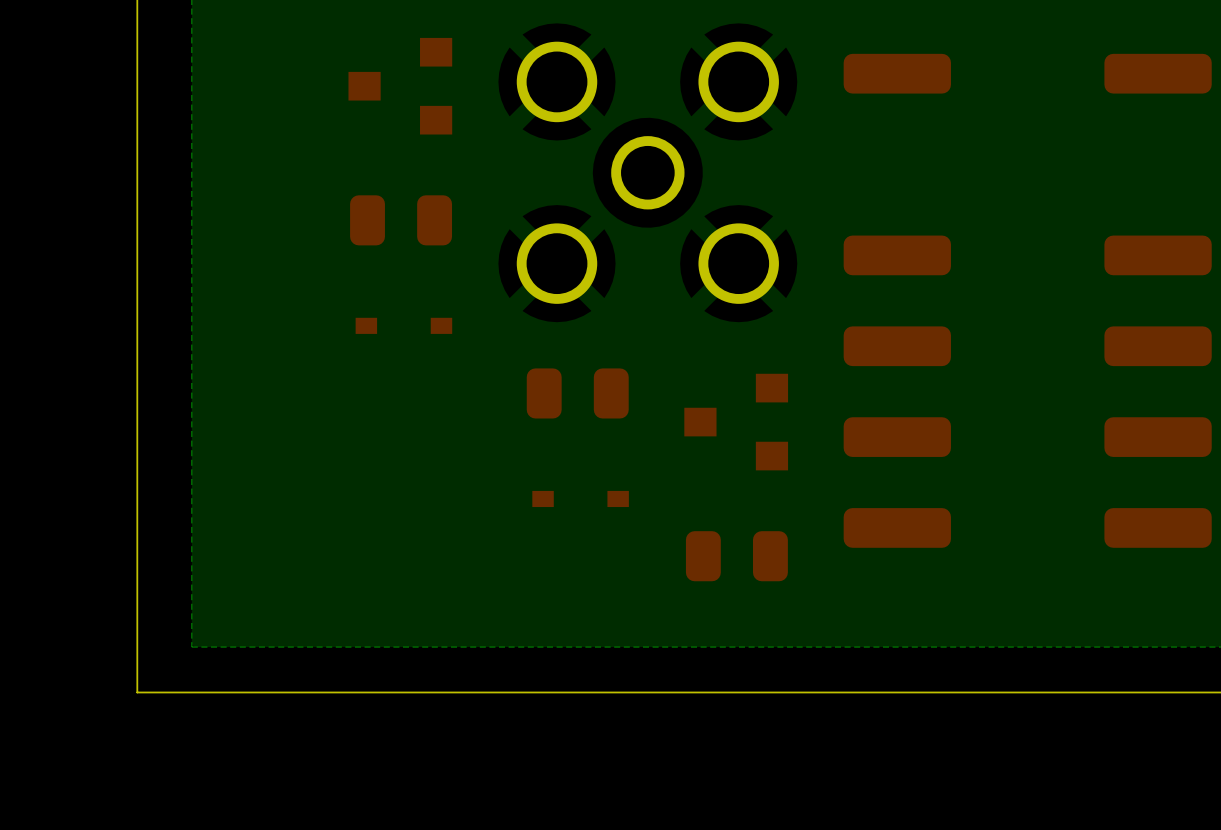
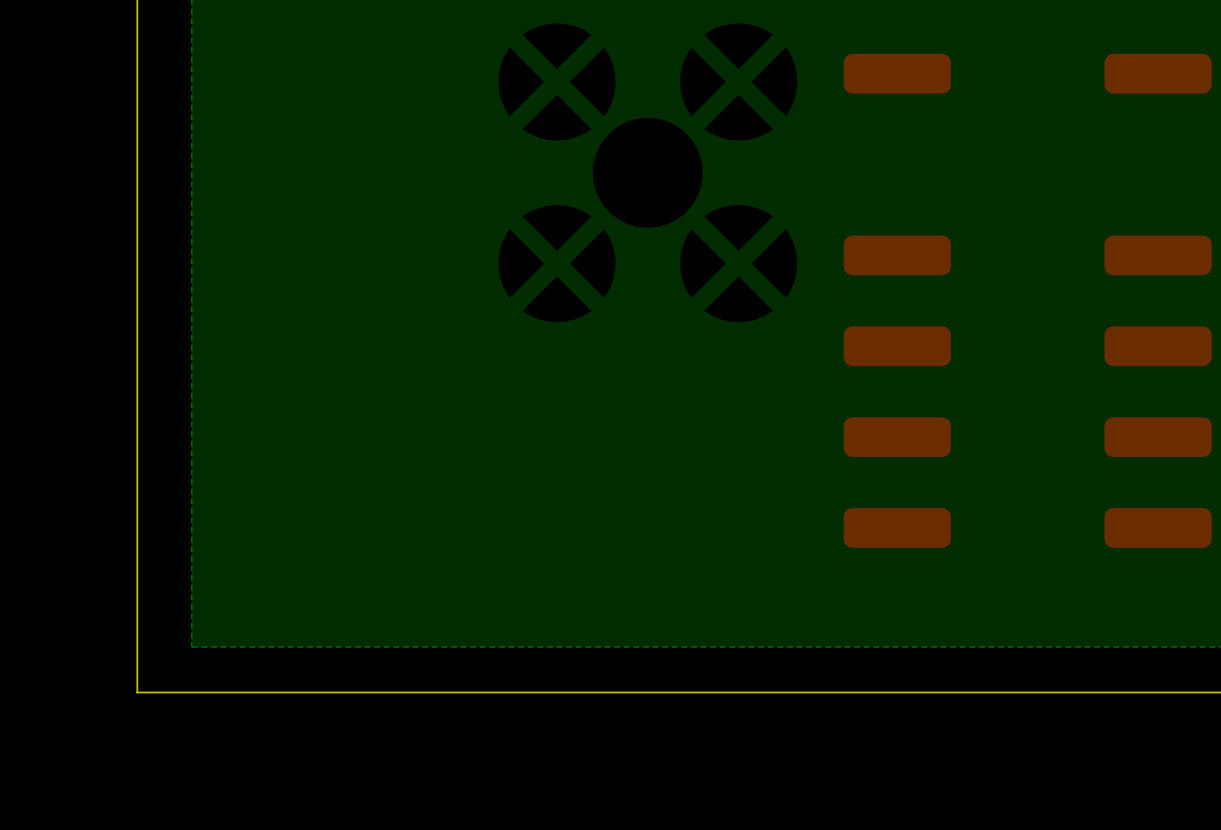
part: (400, 86) -> none
part: (647, 172) -> none
part: (401, 220) -> none
part: (403, 325) -> none
part: (577, 393) -> none
part: (736, 422) -> none
part: (580, 498) -> none
part: (736, 556) -> none

